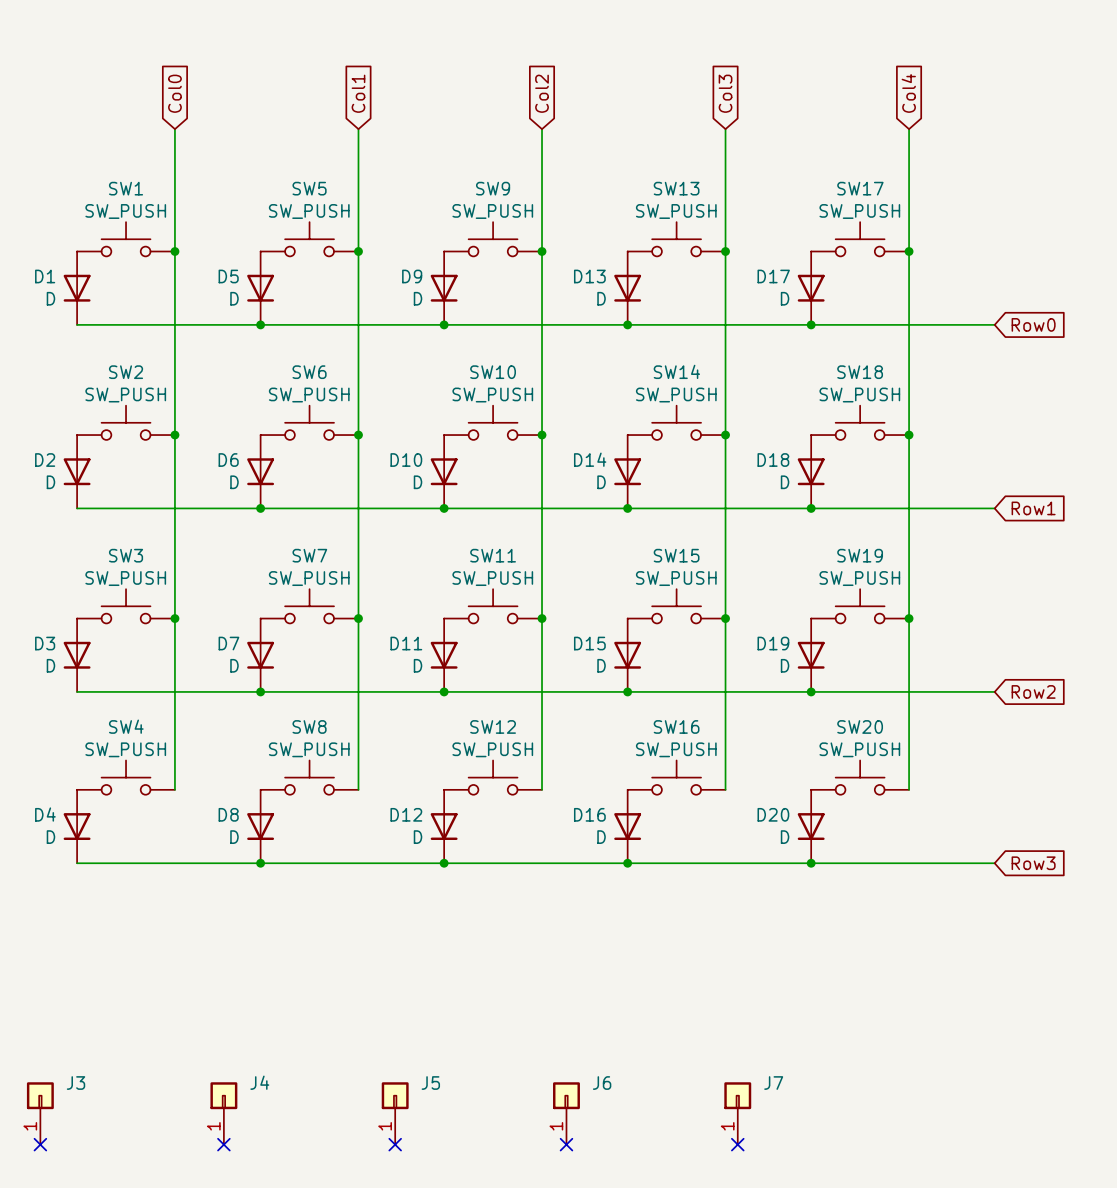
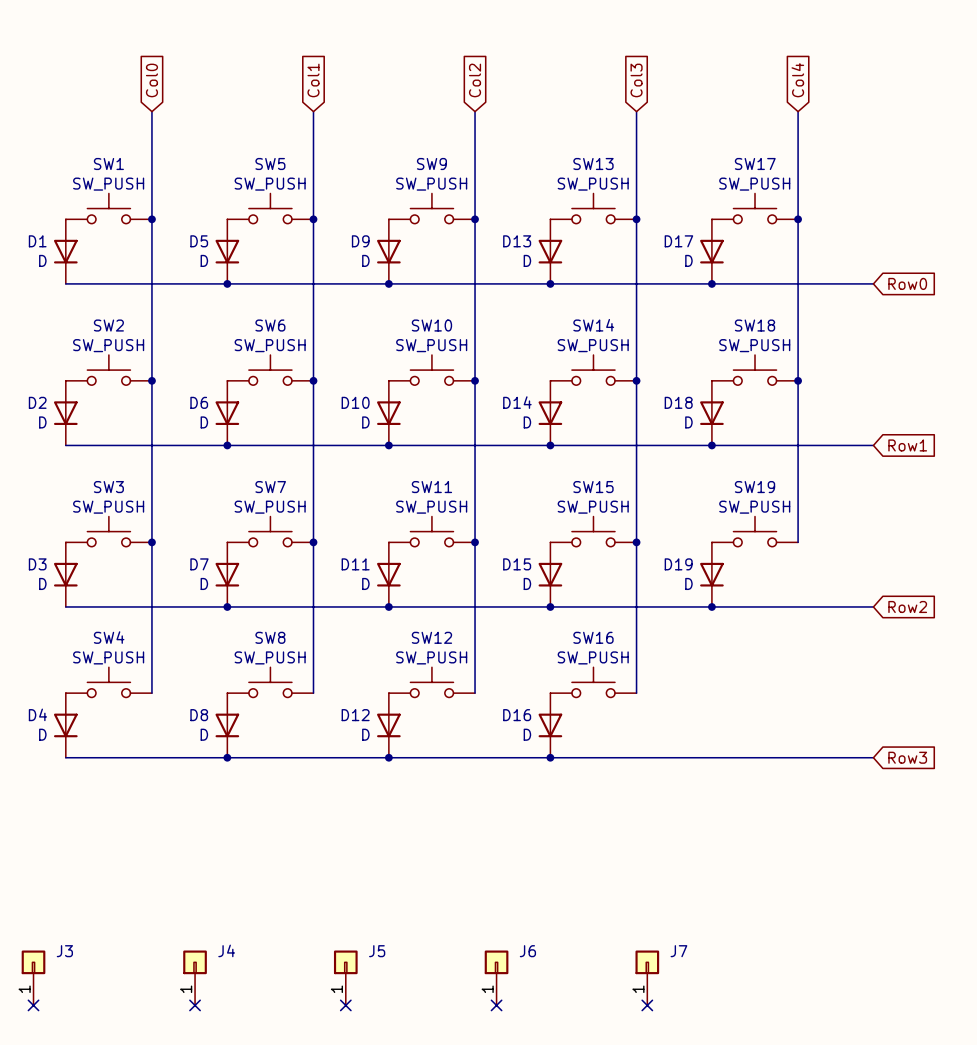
wire: (909, 618) (909, 789) -> none
junction: (909, 618) -> none
SW20: SW_PUSH (860, 777) -> none
D20: D (811, 826) -> none
junction: (811, 863) -> none

